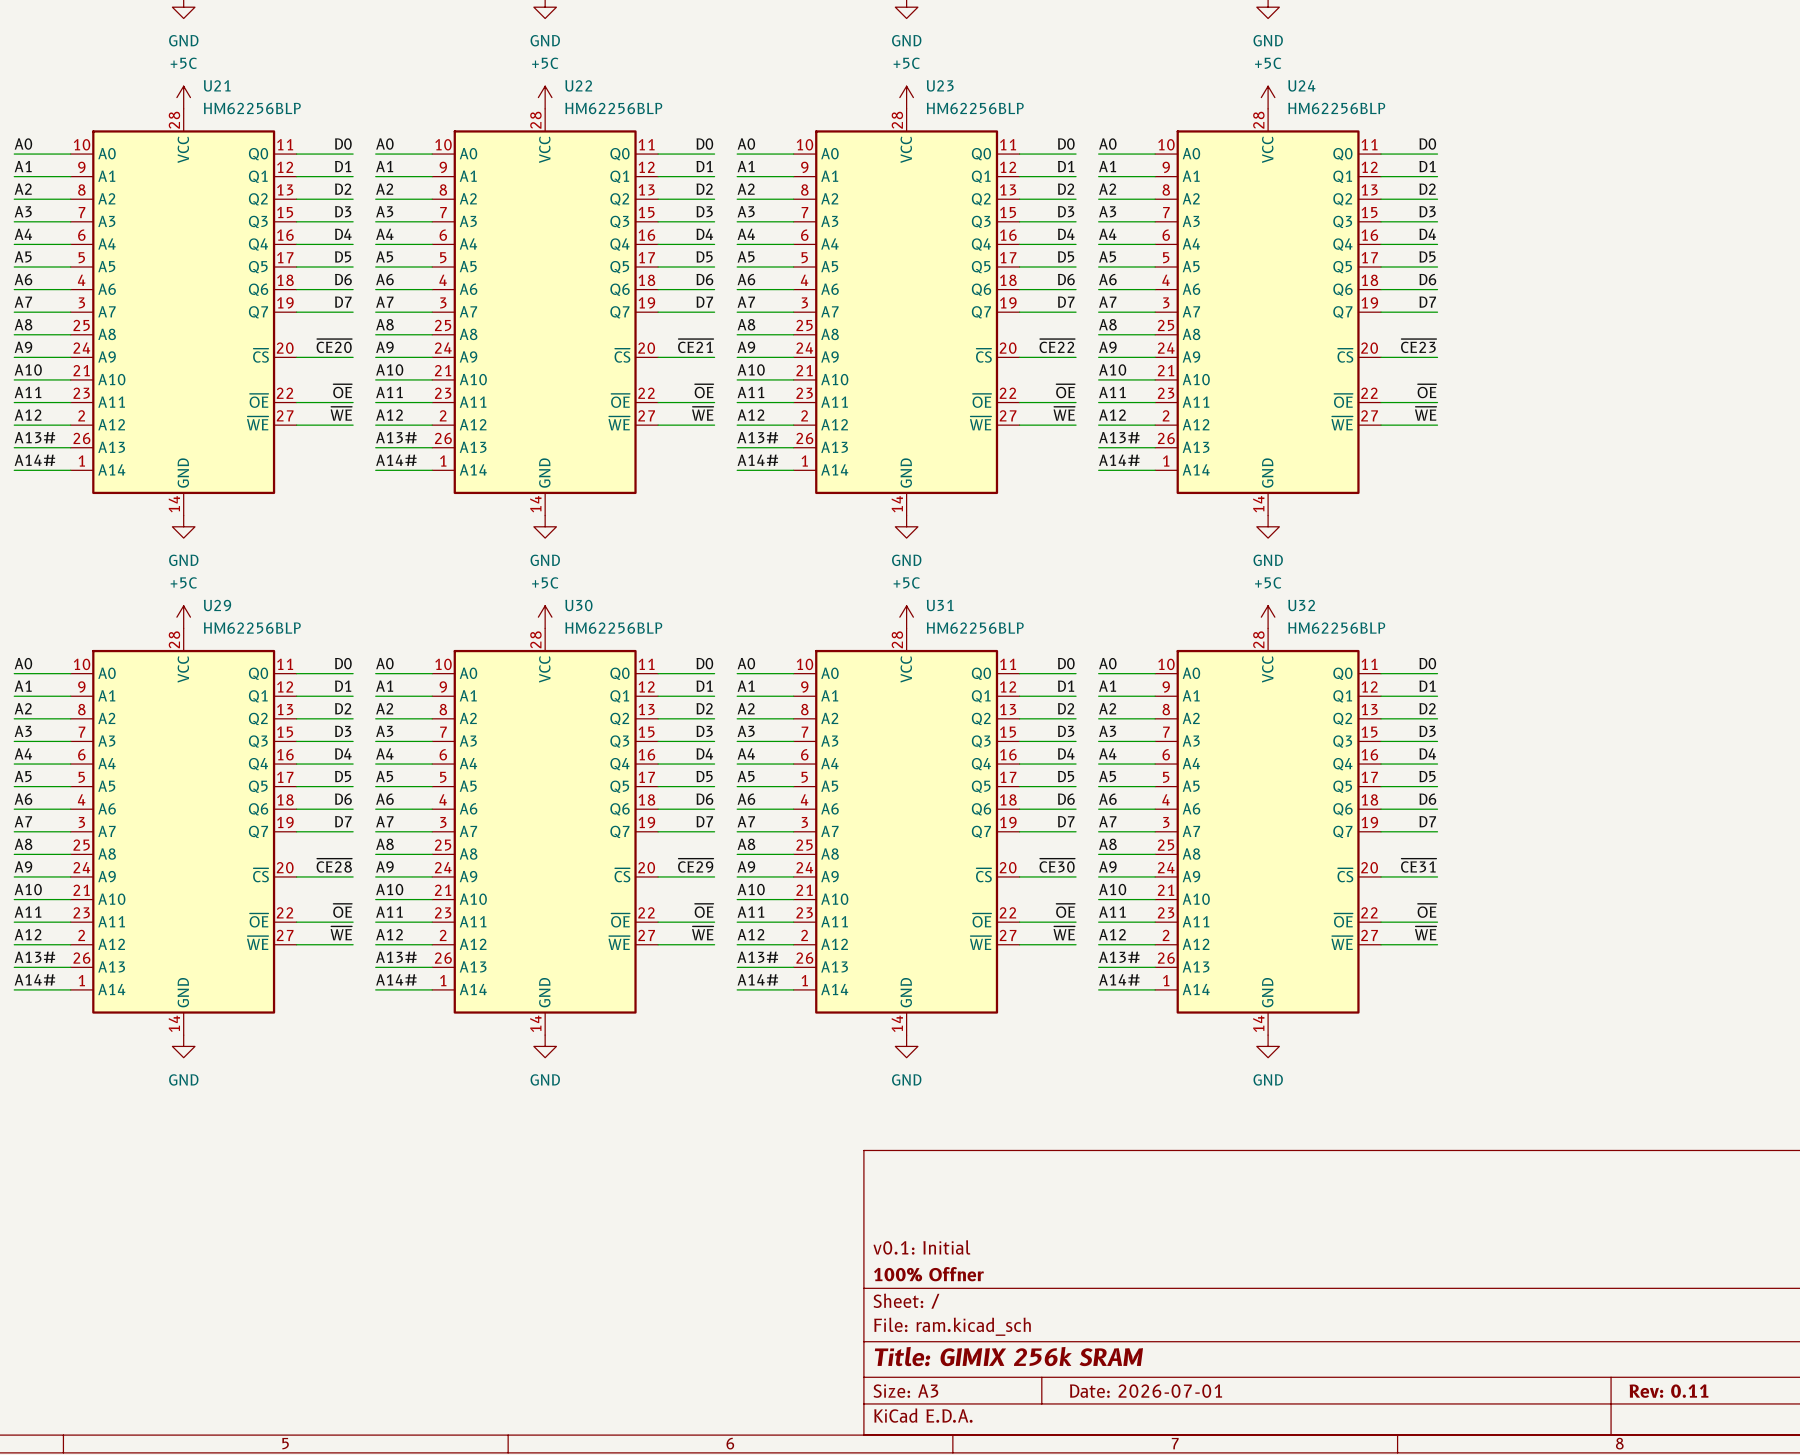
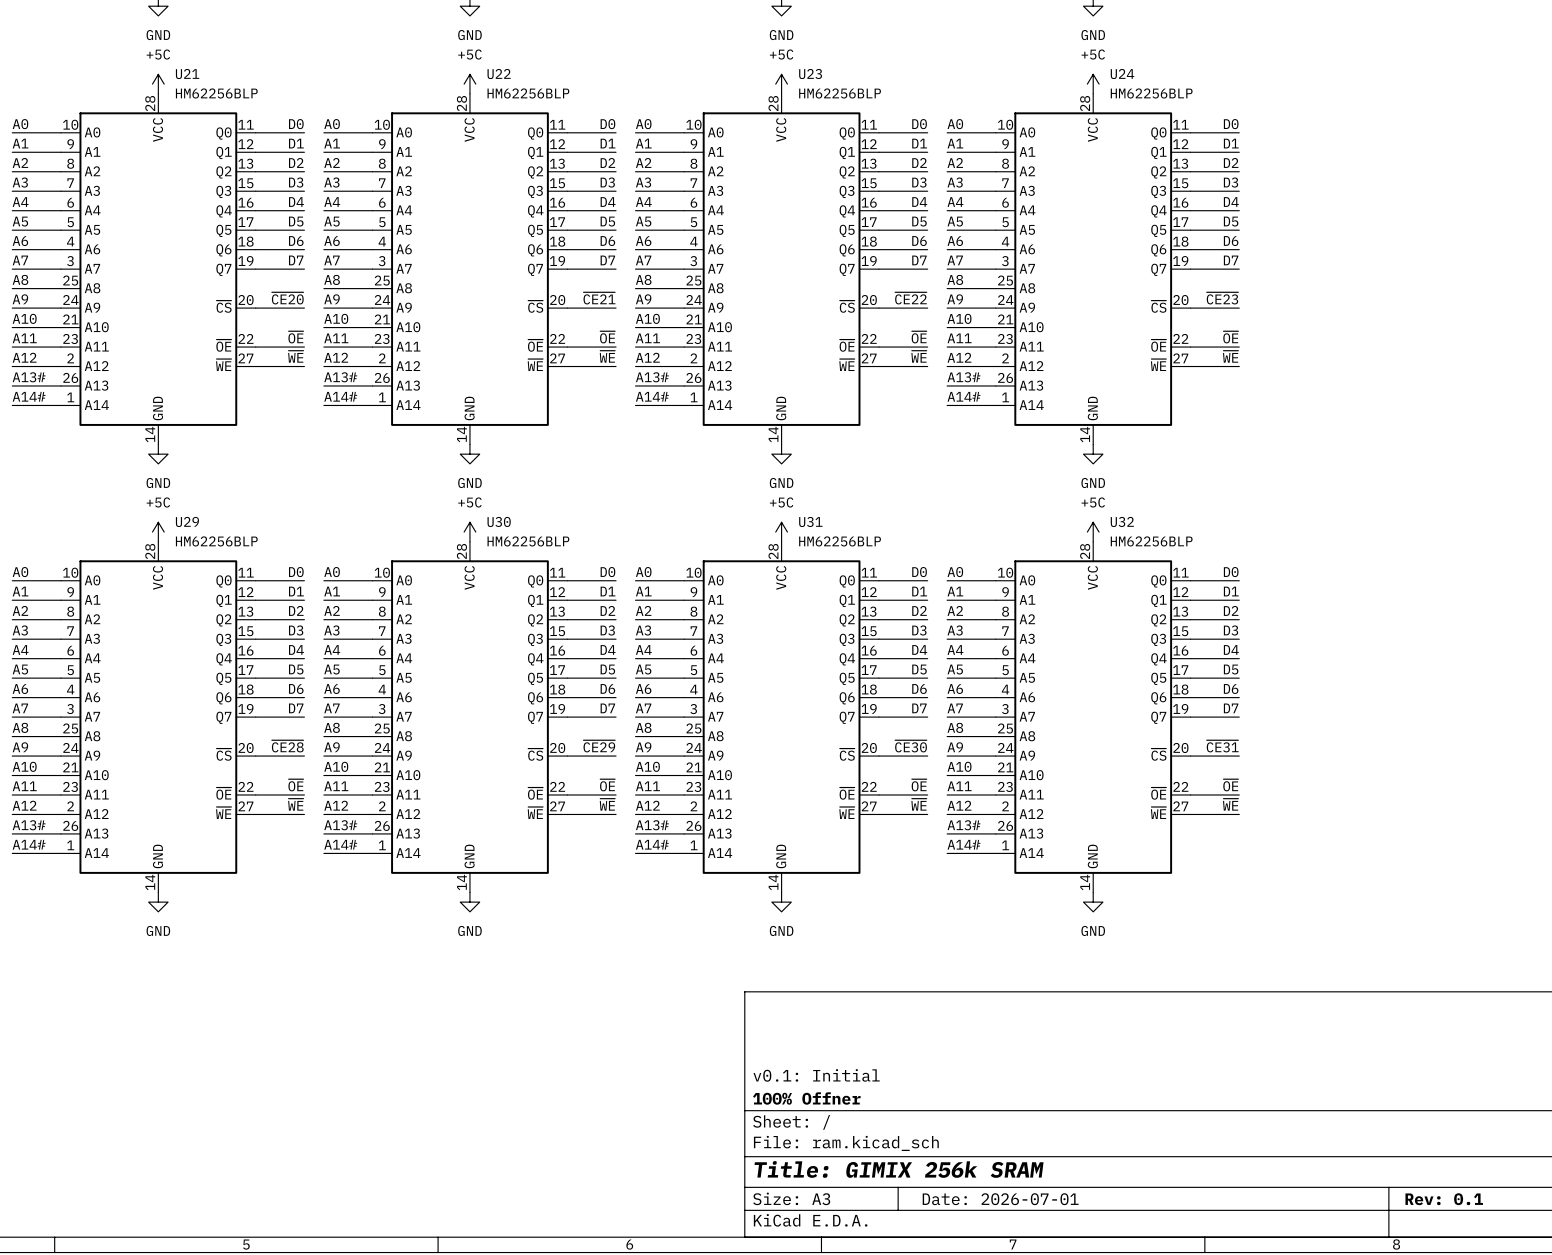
title block: Rev: 0.11 (1668, 1391) -> Rev: 0.1 (1444, 1199)

